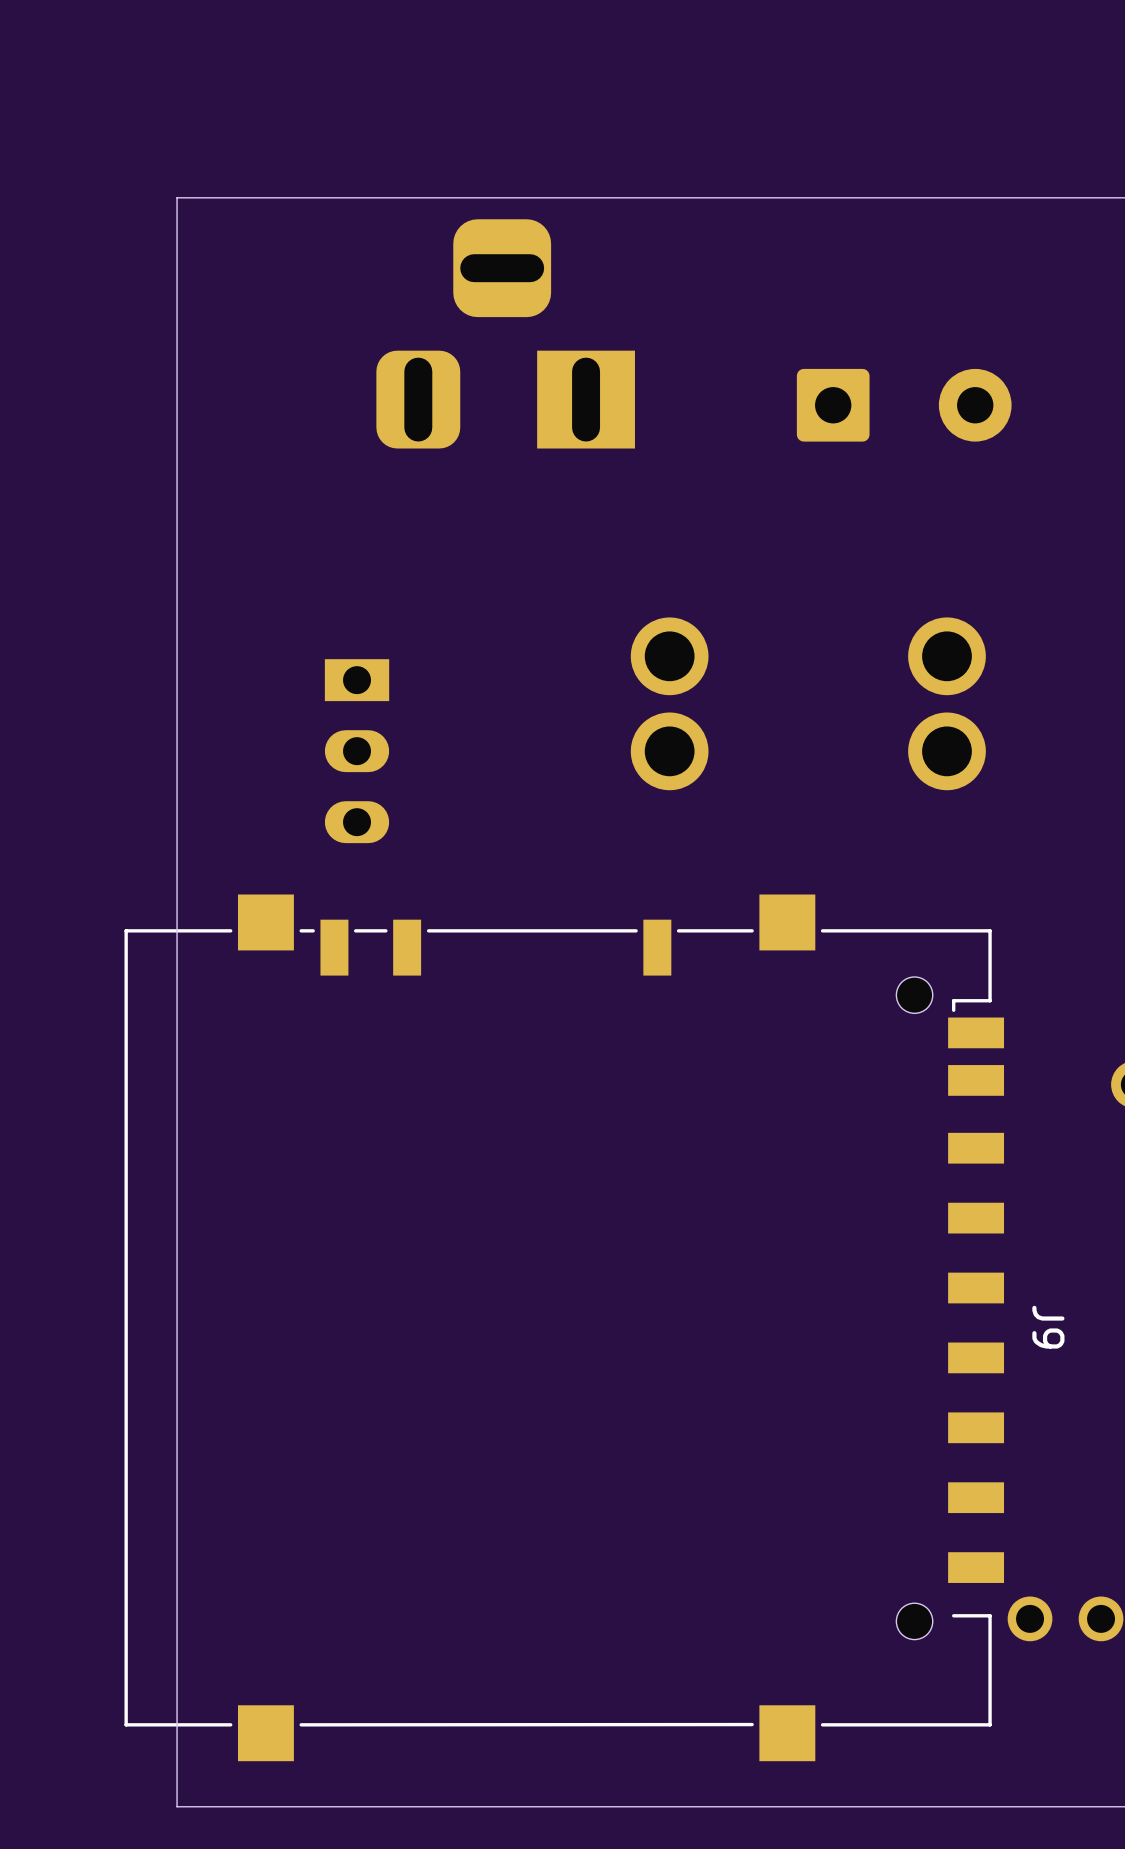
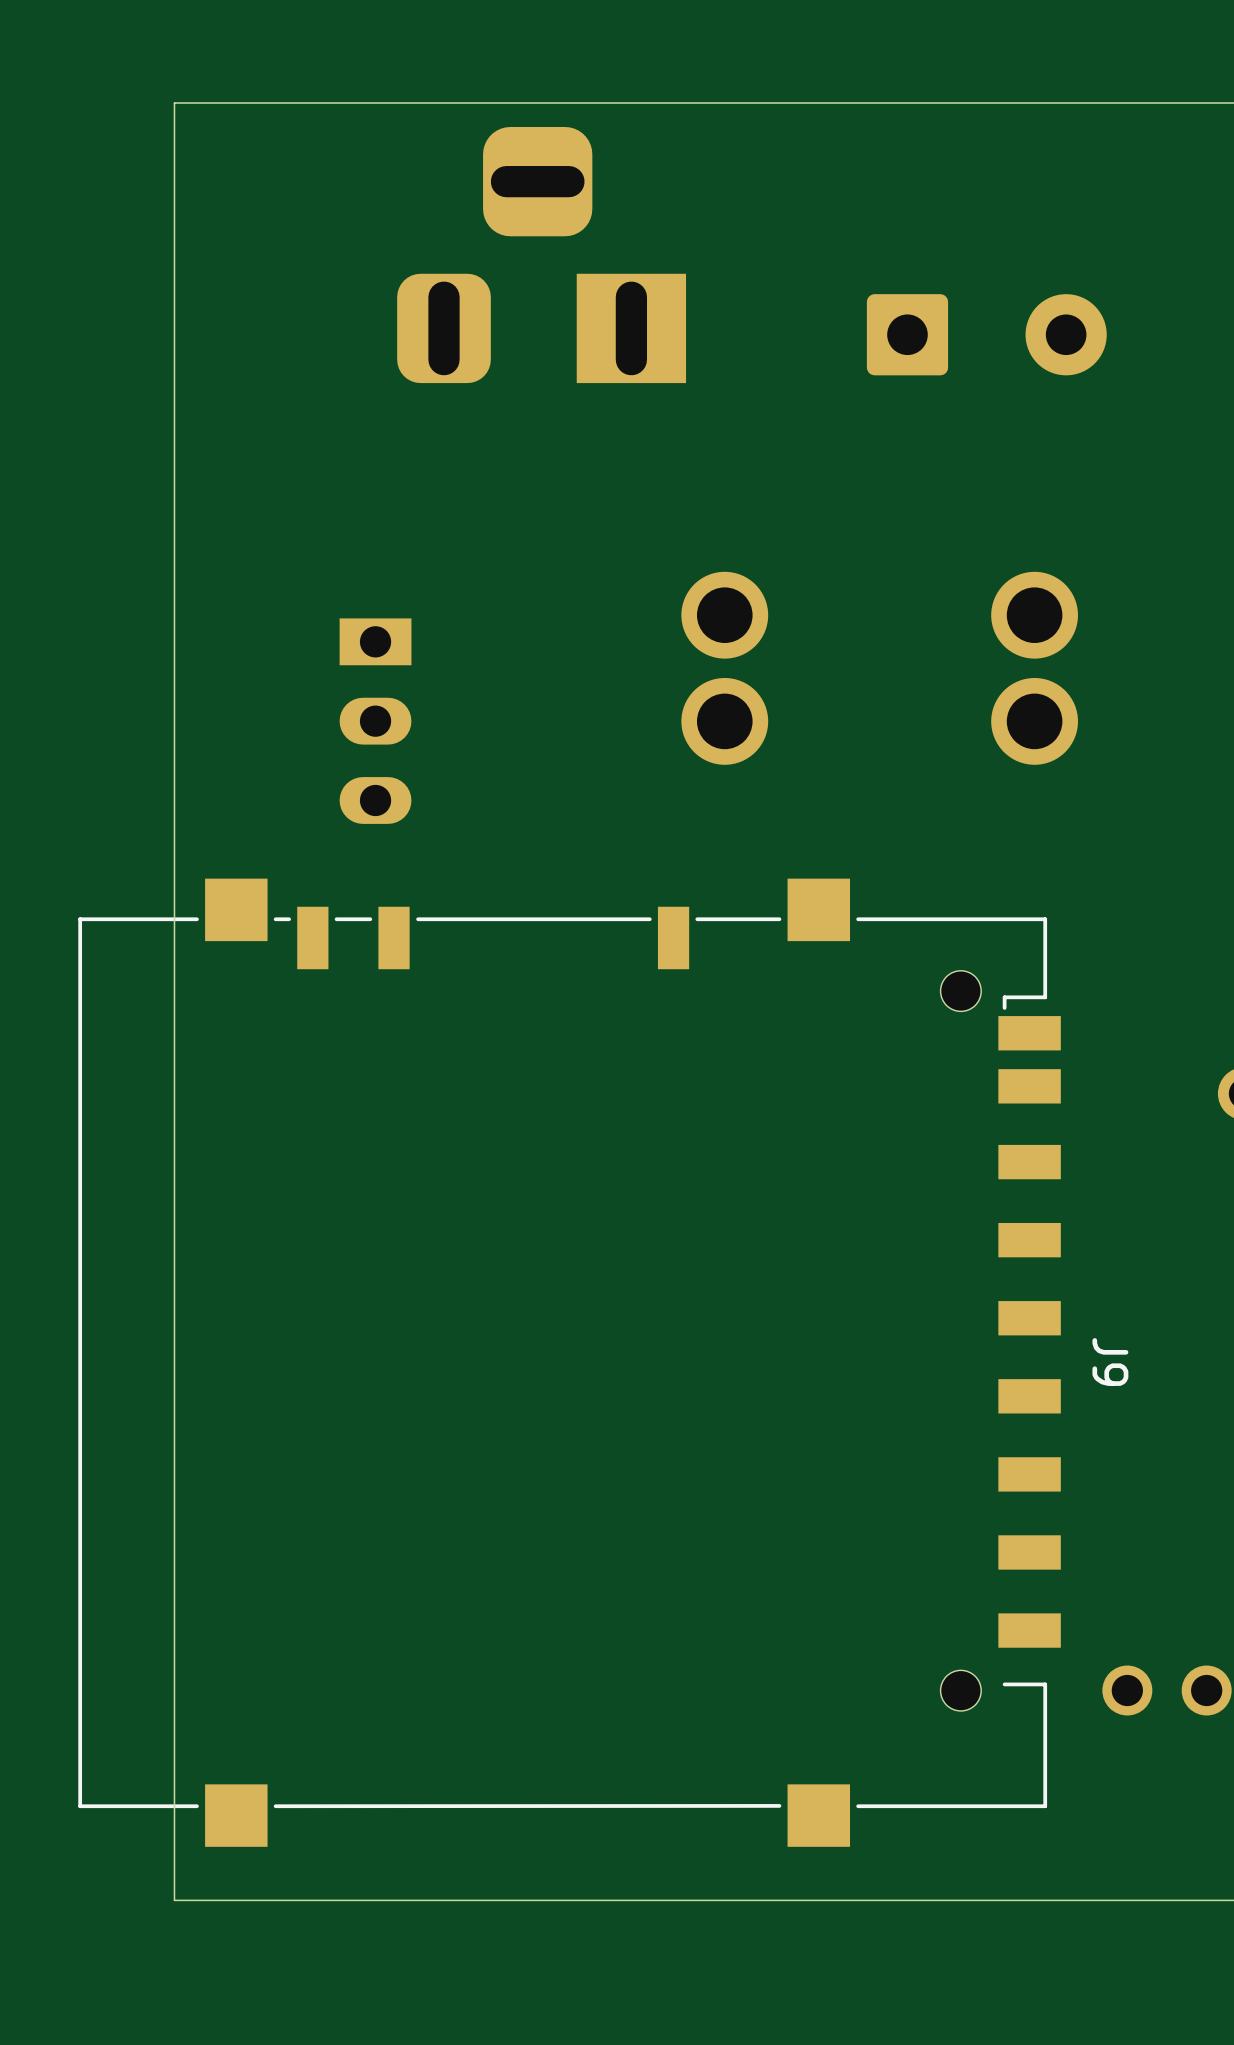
J9 position: (564, 1327) -> (569, 1362)

